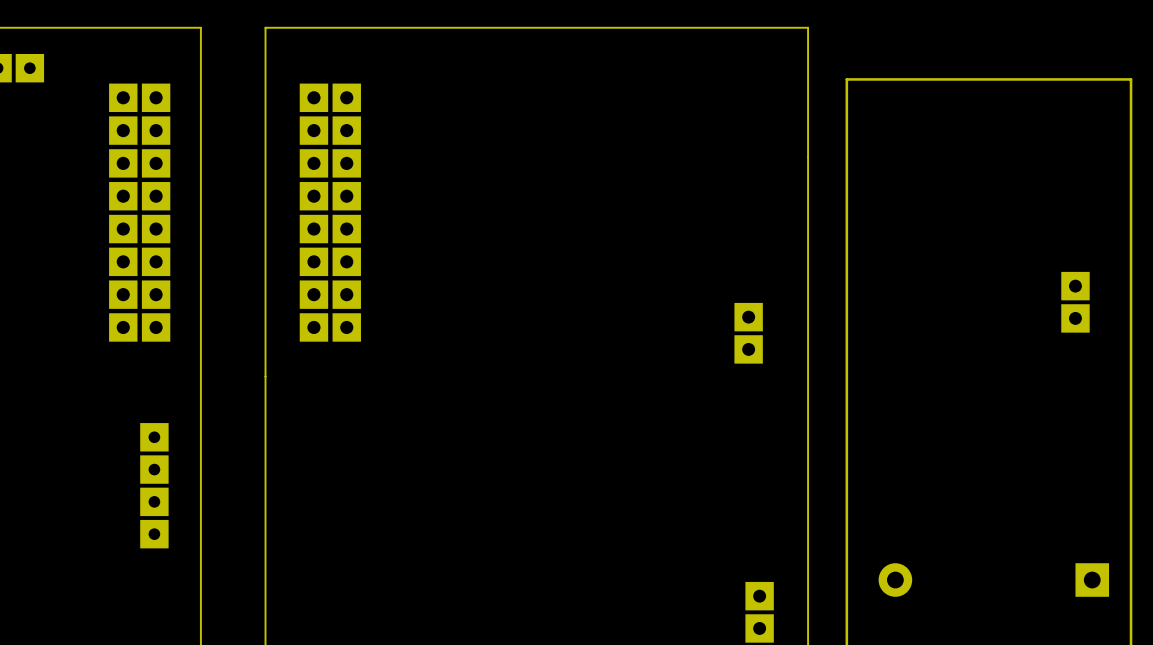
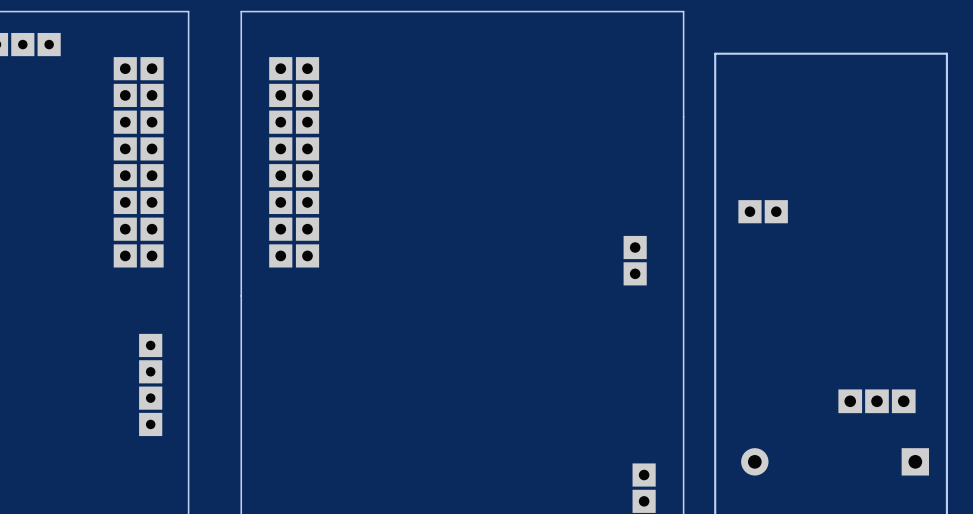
part rotation: 0° (1075, 302) -> 90° clockwise (763, 211)
part position: (1075, 302) -> (763, 211)
part: none -> (876, 401)

